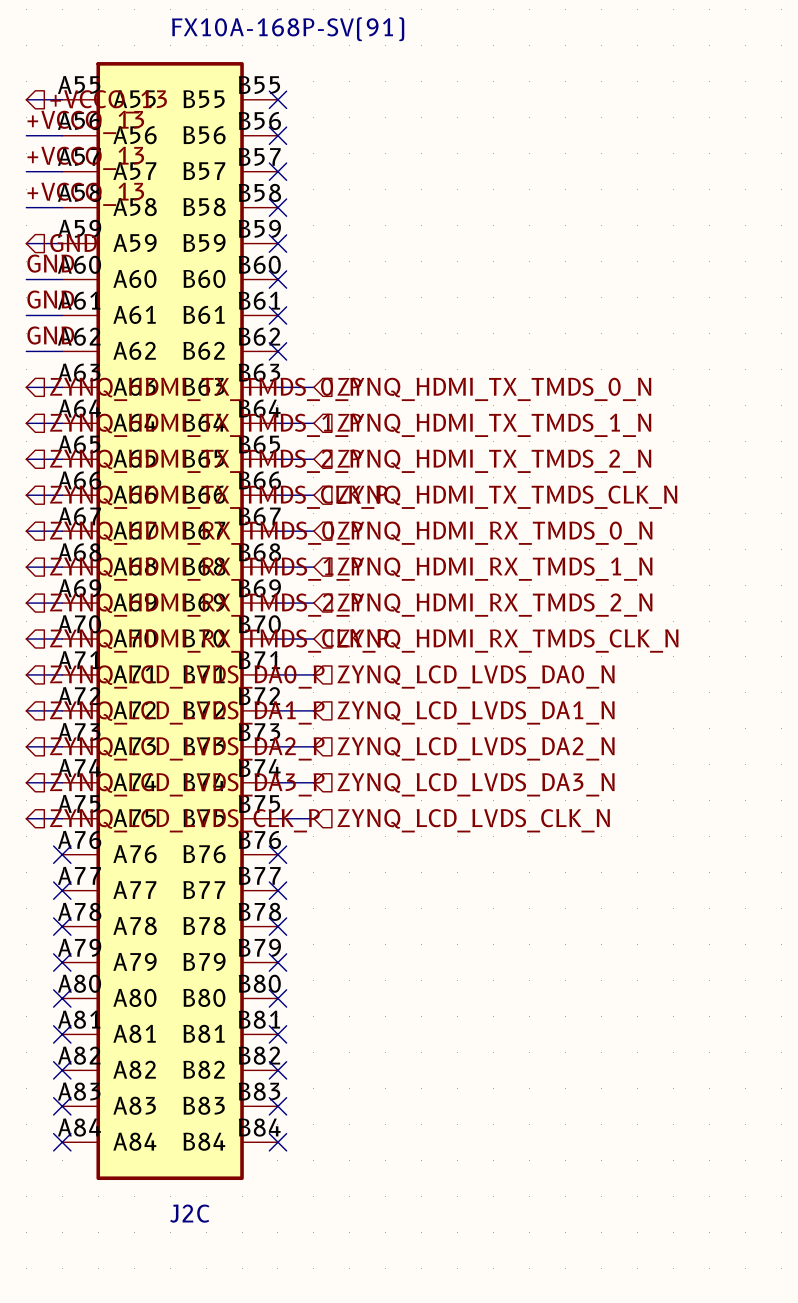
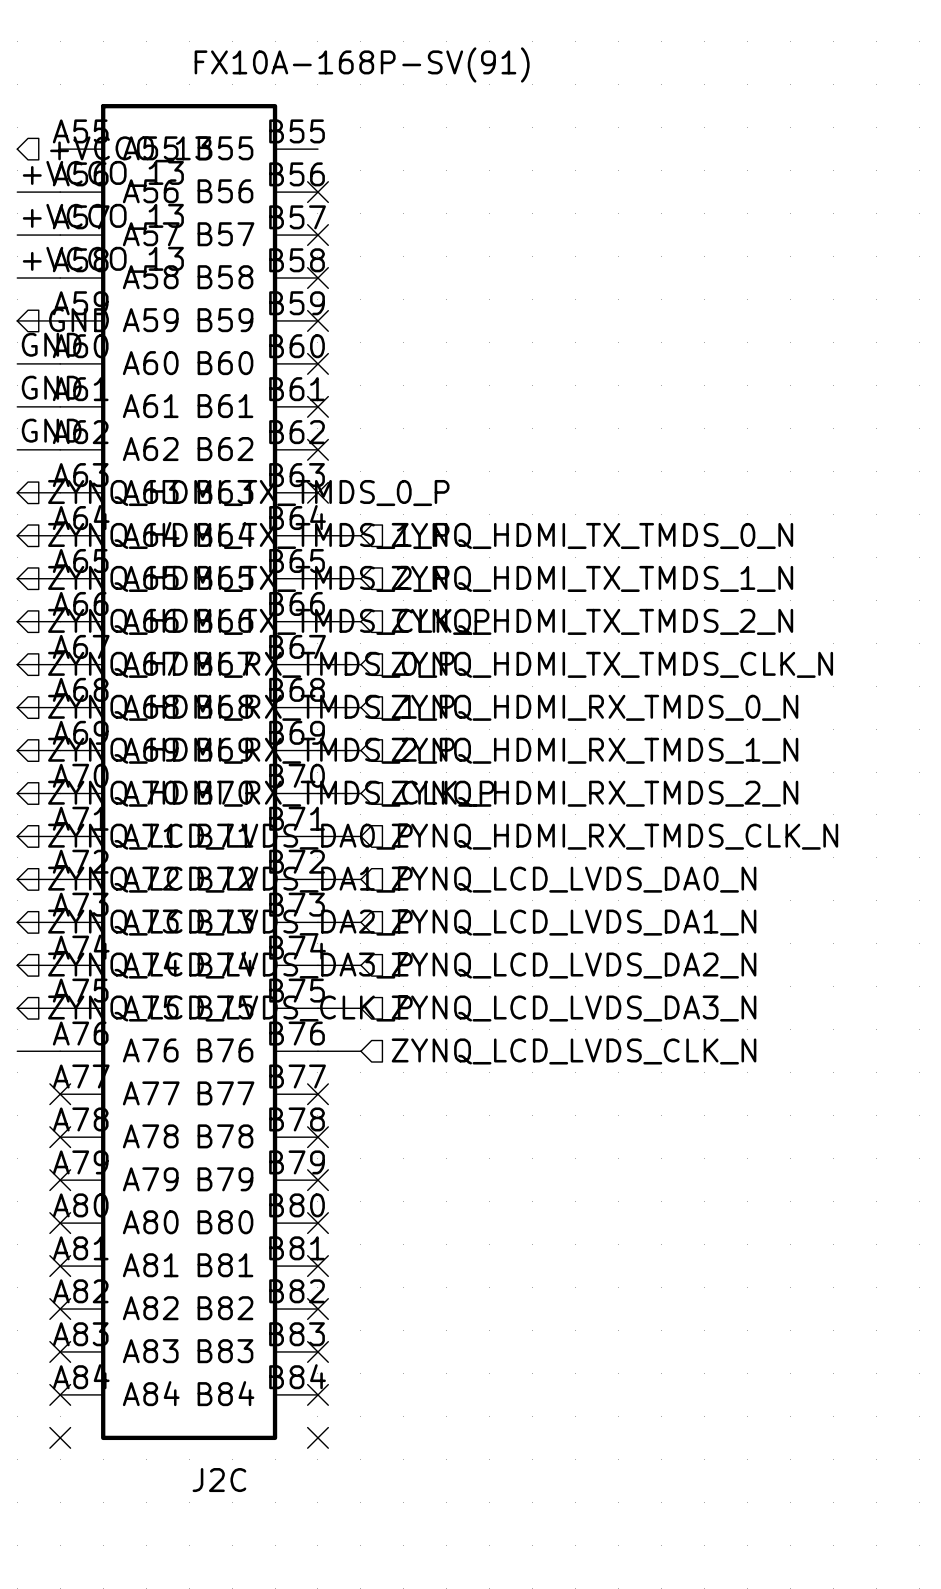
wire: (26, 99) (62, 99) -> none
no-connect mark: (277, 99) -> none
wire: (277, 387) (313, 387) -> none
no-connect mark: none -> (317, 492)
hierarchical label: ZYNQ_HDMI_TX_TMDS_0_N (494, 389) -> none
hierarchical label: ZYNQ_HDMI_TX_TMDS_1_N (494, 425) -> ZYNQ_HDMI_TX_TMDS_0_N (592, 535)
hierarchical label: ZYNQ_HDMI_TX_TMDS_2_N (494, 461) -> ZYNQ_HDMI_TX_TMDS_1_N (592, 578)
hierarchical label: ZYNQ_HDMI_TX_TMDS_CLK_N (507, 497) -> ZYNQ_HDMI_TX_TMDS_2_N (592, 621)
hierarchical label: ZYNQ_HDMI_RX_TMDS_0_N (494, 533) -> ZYNQ_HDMI_TX_TMDS_CLK_N (612, 664)
hierarchical label: ZYNQ_HDMI_RX_TMDS_1_N (494, 569) -> ZYNQ_HDMI_RX_TMDS_0_N (595, 707)
hierarchical label: ZYNQ_HDMI_RX_TMDS_2_N (494, 605) -> ZYNQ_HDMI_RX_TMDS_1_N (595, 750)
hierarchical label: ZYNQ_HDMI_RX_TMDS_CLK_N (507, 641) -> ZYNQ_HDMI_RX_TMDS_2_N (595, 793)
hierarchical label: ZYNQ_LCD_LVDS_DA0_N (476, 676) -> ZYNQ_HDMI_RX_TMDS_CLK_N (614, 836)
hierarchical label: ZYNQ_LCD_LVDS_DA1_N (476, 712) -> ZYNQ_LCD_LVDS_DA0_N (574, 879)
hierarchical label: ZYNQ_LCD_LVDS_DA2_N (476, 748) -> ZYNQ_LCD_LVDS_DA1_N (574, 922)
hierarchical label: ZYNQ_LCD_LVDS_DA3_N (476, 784) -> ZYNQ_LCD_LVDS_DA2_N (574, 965)
hierarchical label: ZYNQ_LCD_LVDS_CLK_N (473, 820) -> ZYNQ_LCD_LVDS_DA3_N (574, 1008)
wire: none -> (17, 1051) (60, 1051)
no-connect mark: (62, 854) -> none
wire: none -> (317, 1051) (360, 1051)
no-connect mark: (277, 854) -> none
hierarchical label: none -> ZYNQ_LCD_LVDS_CLK_N (574, 1051)
no-connect mark: none -> (60, 1437)
no-connect mark: none -> (317, 1437)

